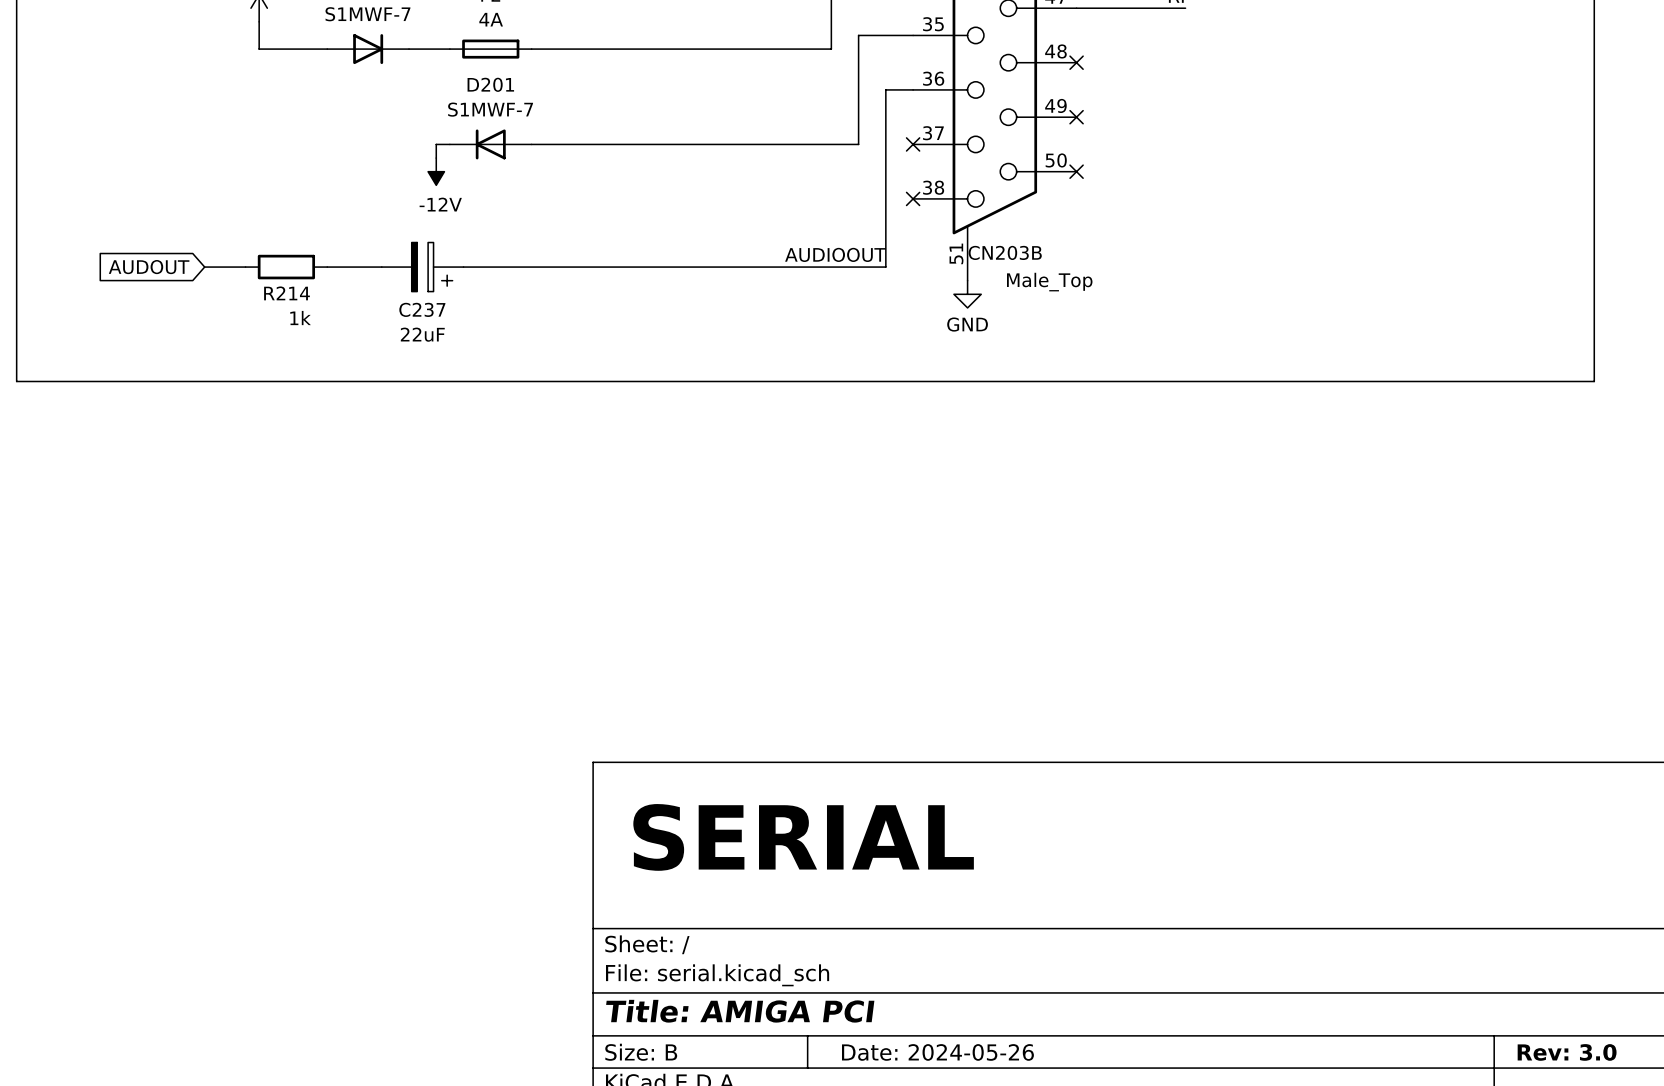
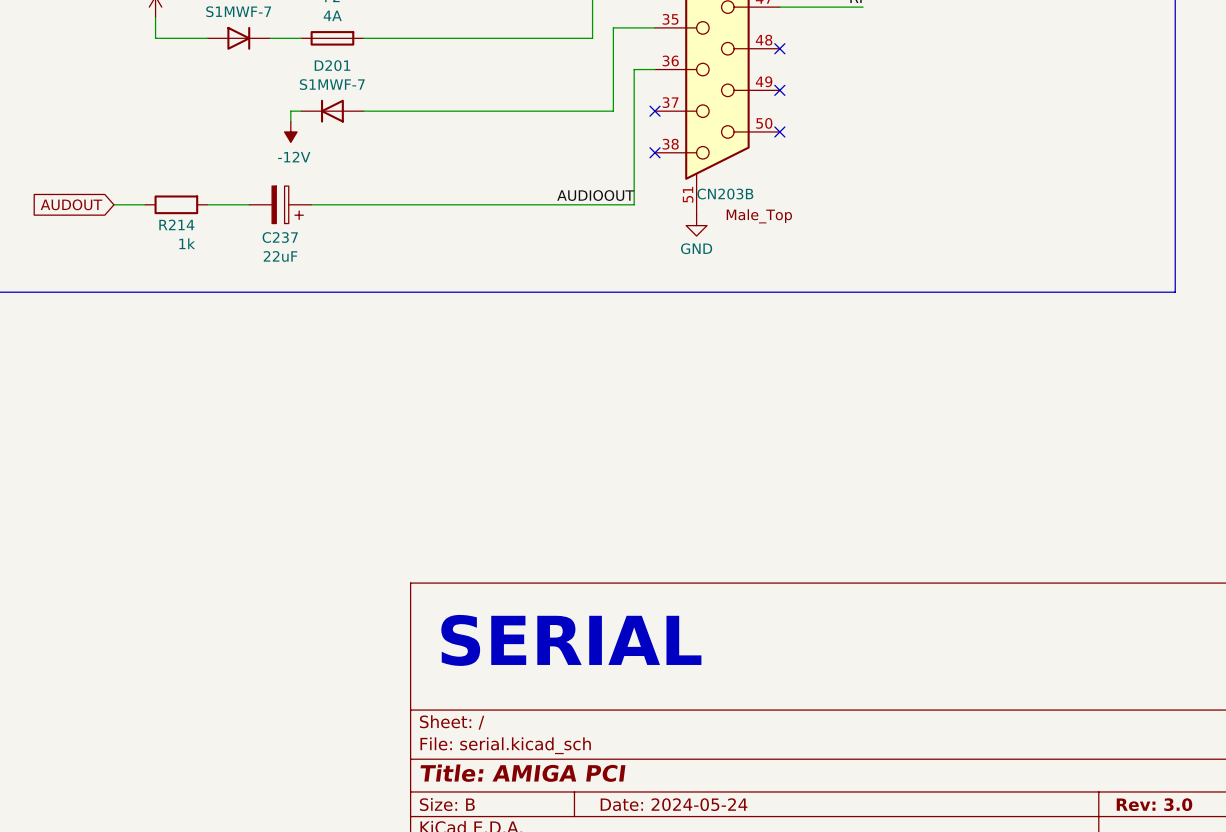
title block: Date: 2024-05-26 (937, 1052) -> Date: 2024-05-24 (674, 804)

